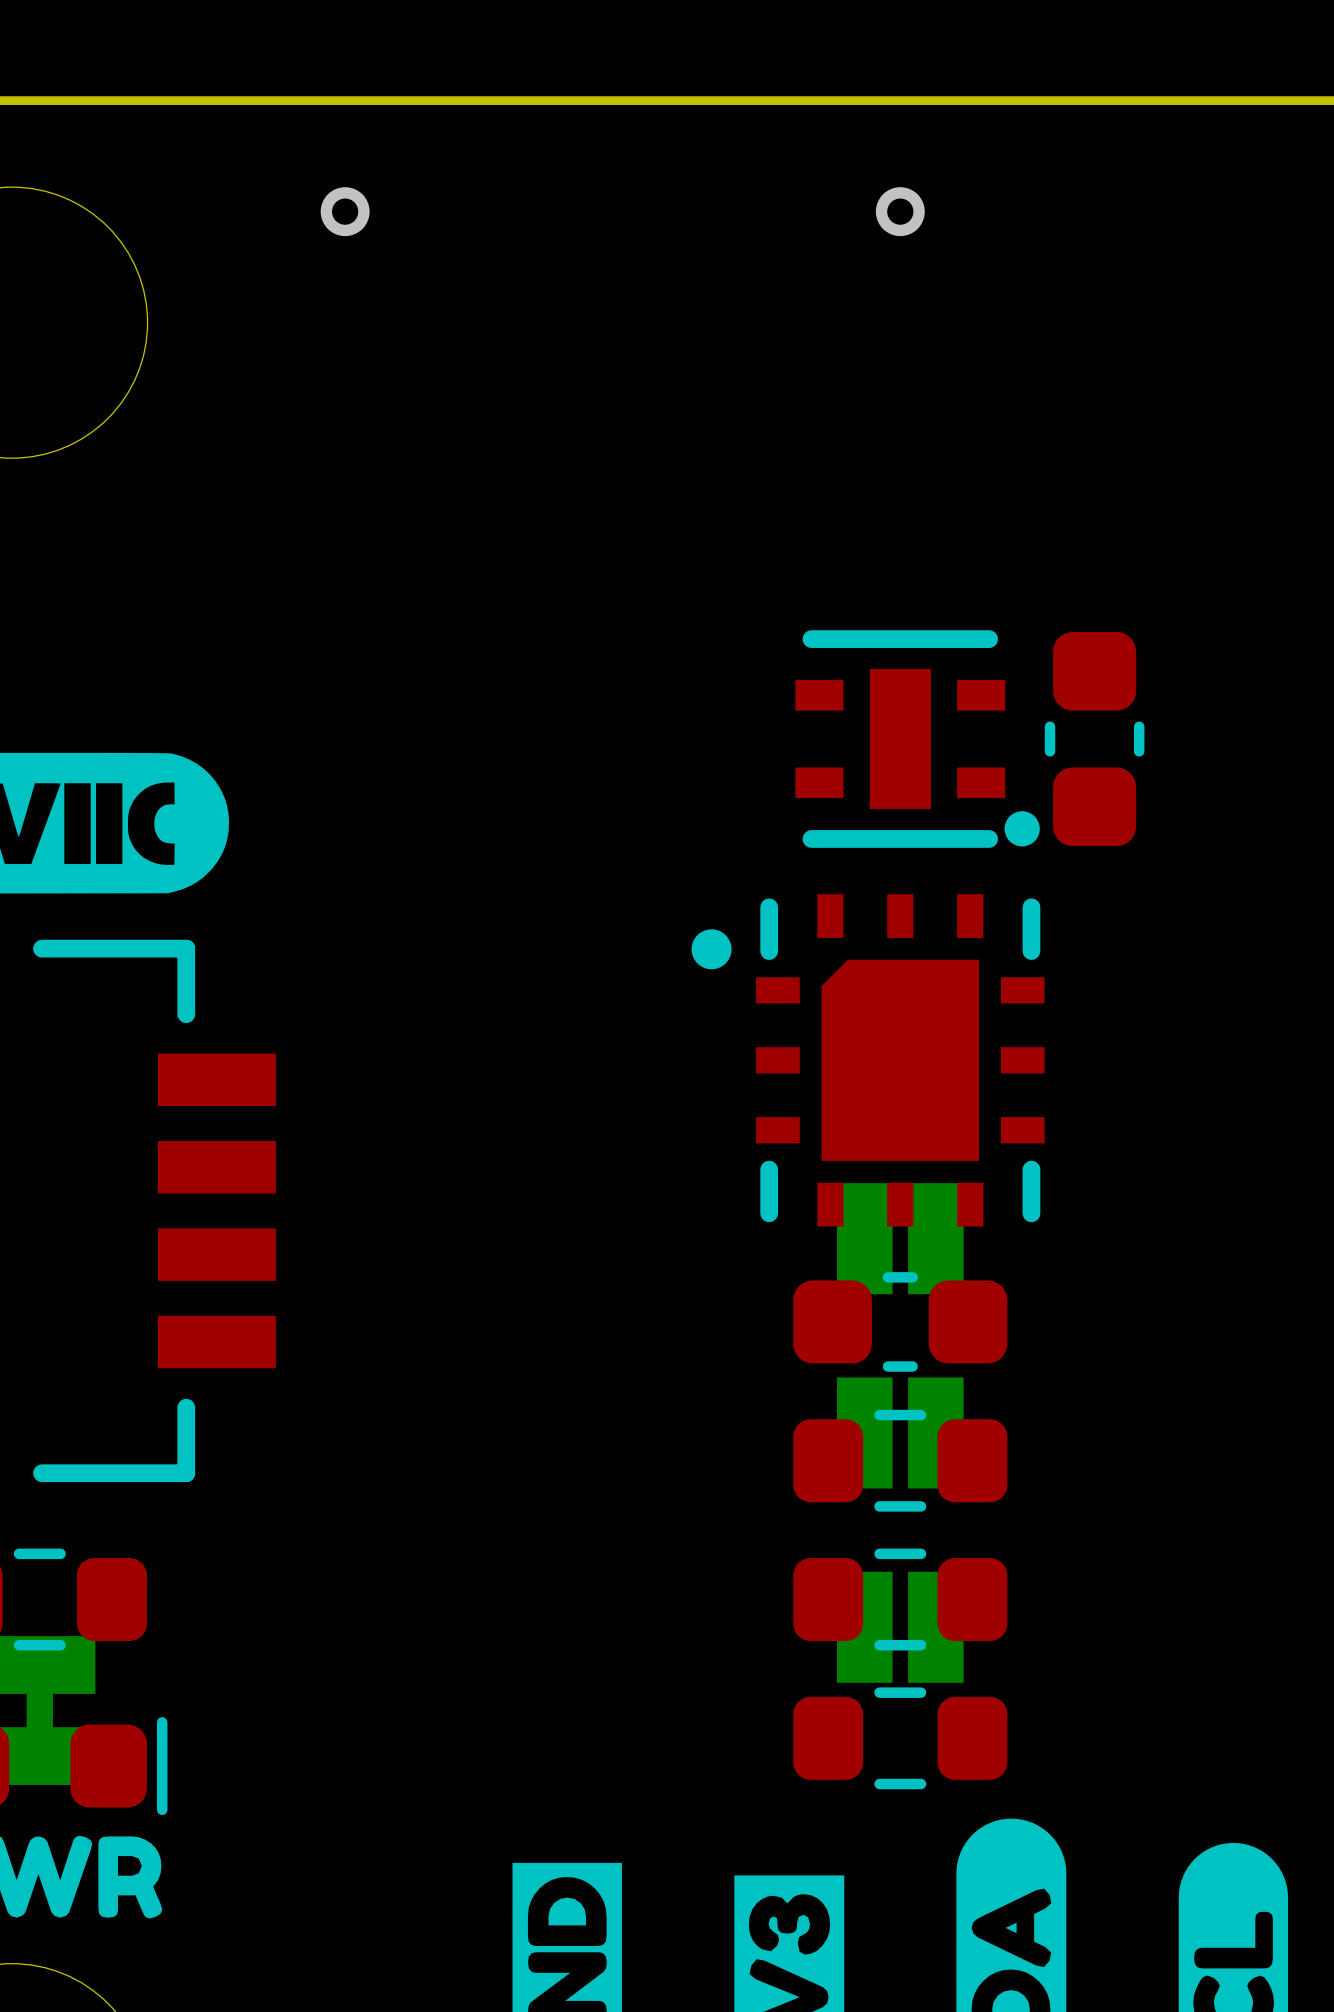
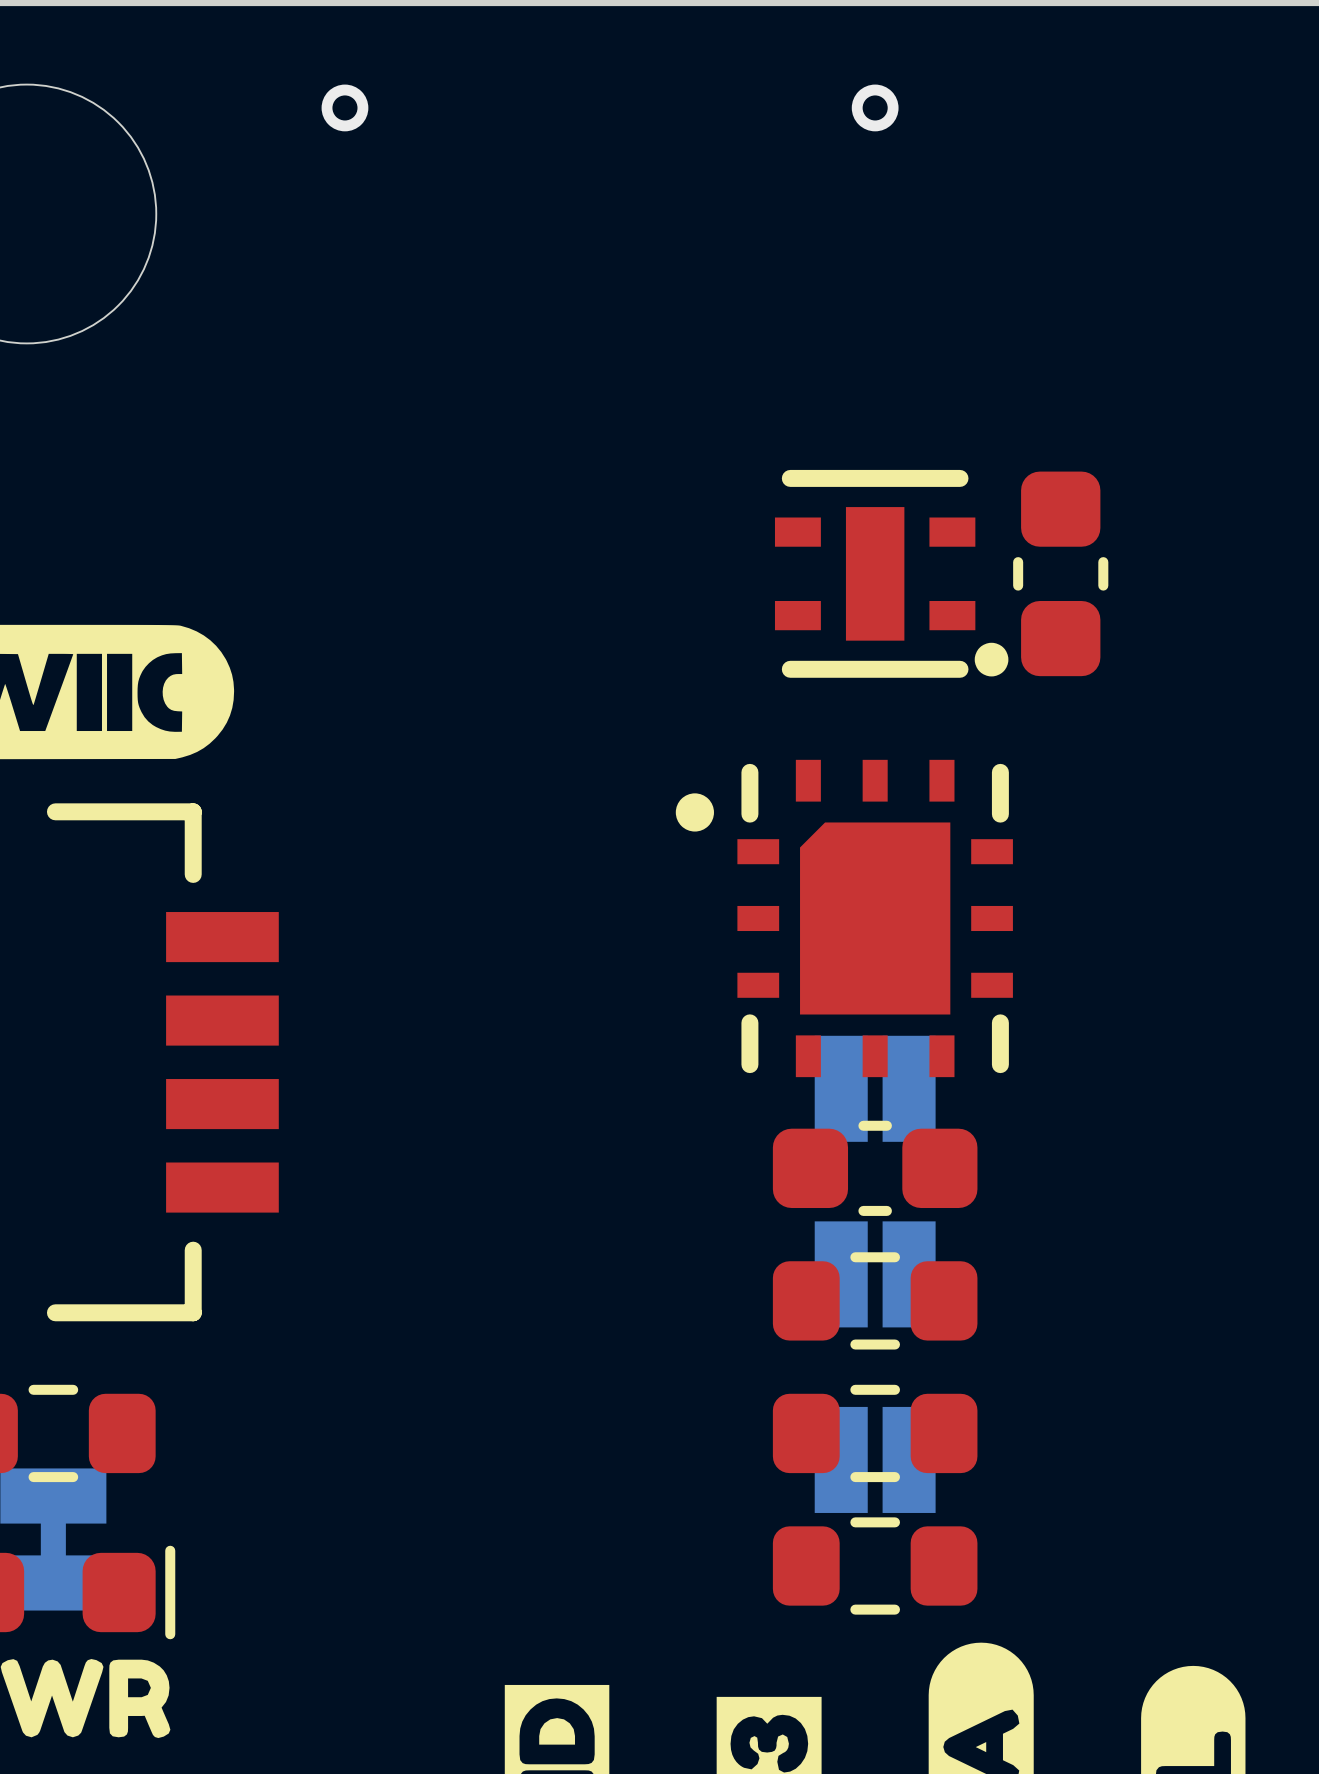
part position: (917, 739) -> (891, 573)
part position: (1094, 739) -> (1060, 573)

